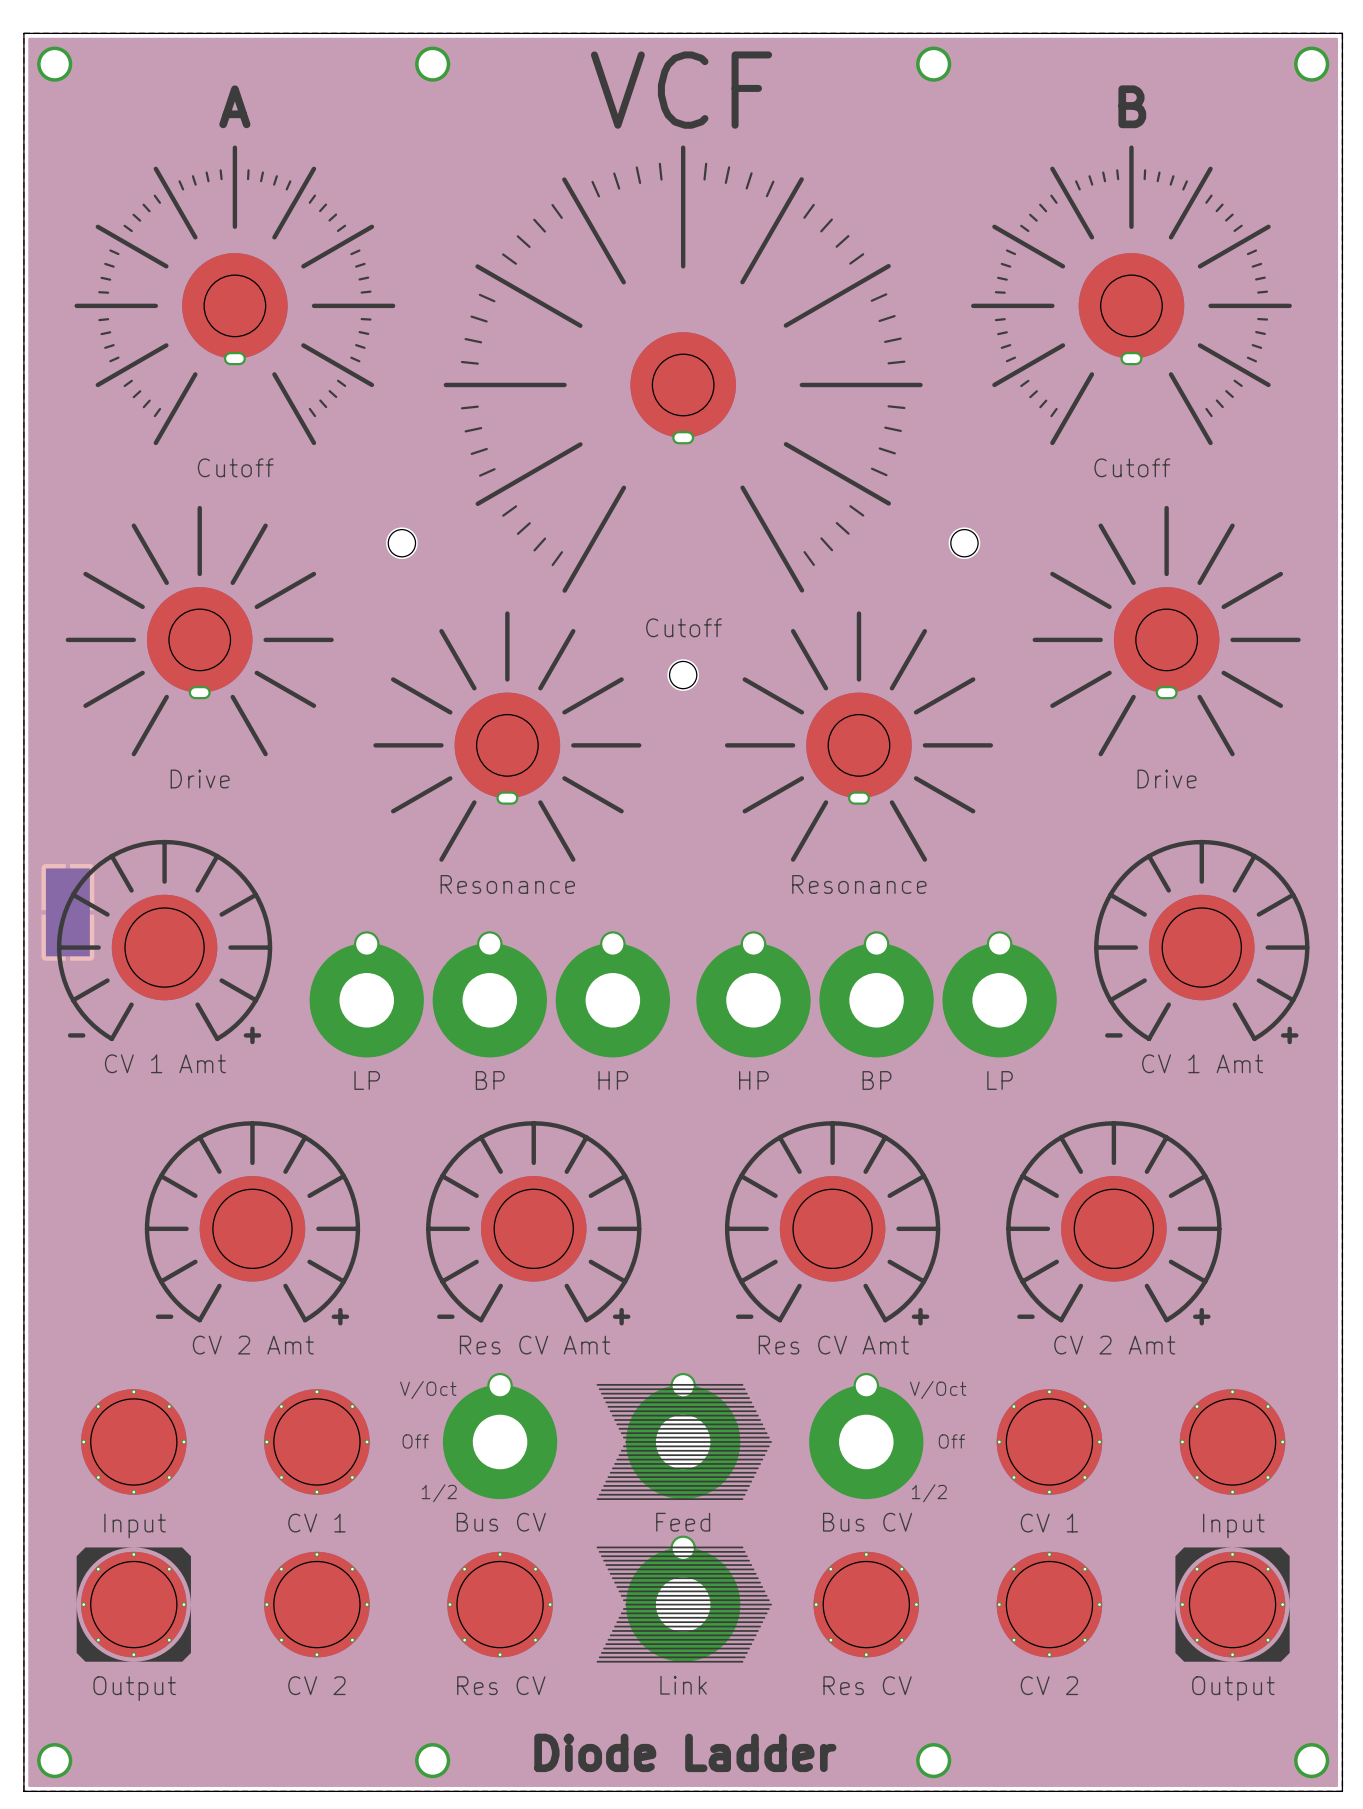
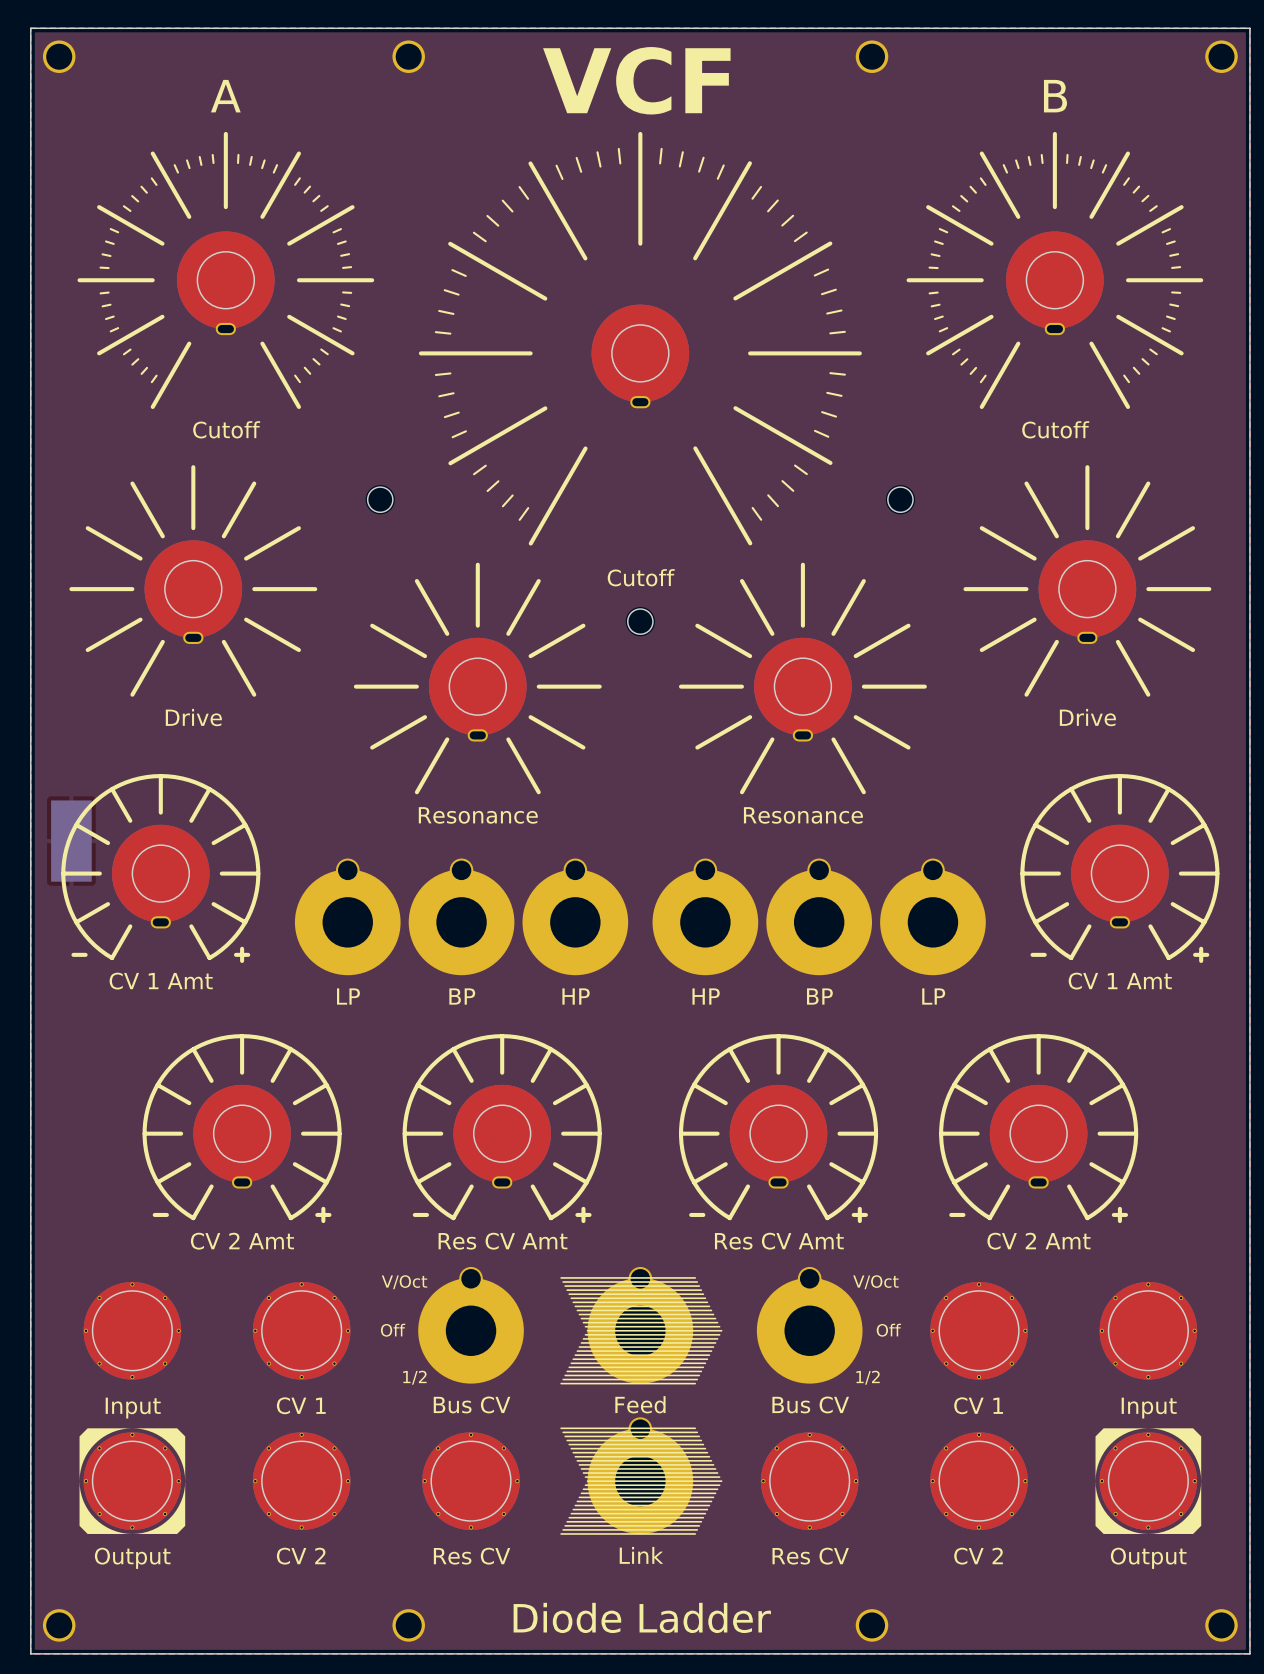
part footprint: [56, 839, 273, 1045] -> [61, 774, 261, 963]
part footprint: [1094, 839, 1310, 1045] -> [1020, 774, 1220, 963]
part footprint: [144, 1121, 361, 1326] -> [142, 1034, 342, 1224]
part footprint: [426, 1121, 642, 1326] -> [402, 1034, 602, 1224]
part footprint: [724, 1121, 941, 1326] -> [678, 1034, 879, 1224]
part footprint: [1006, 1121, 1222, 1326] -> [939, 1034, 1139, 1224]

